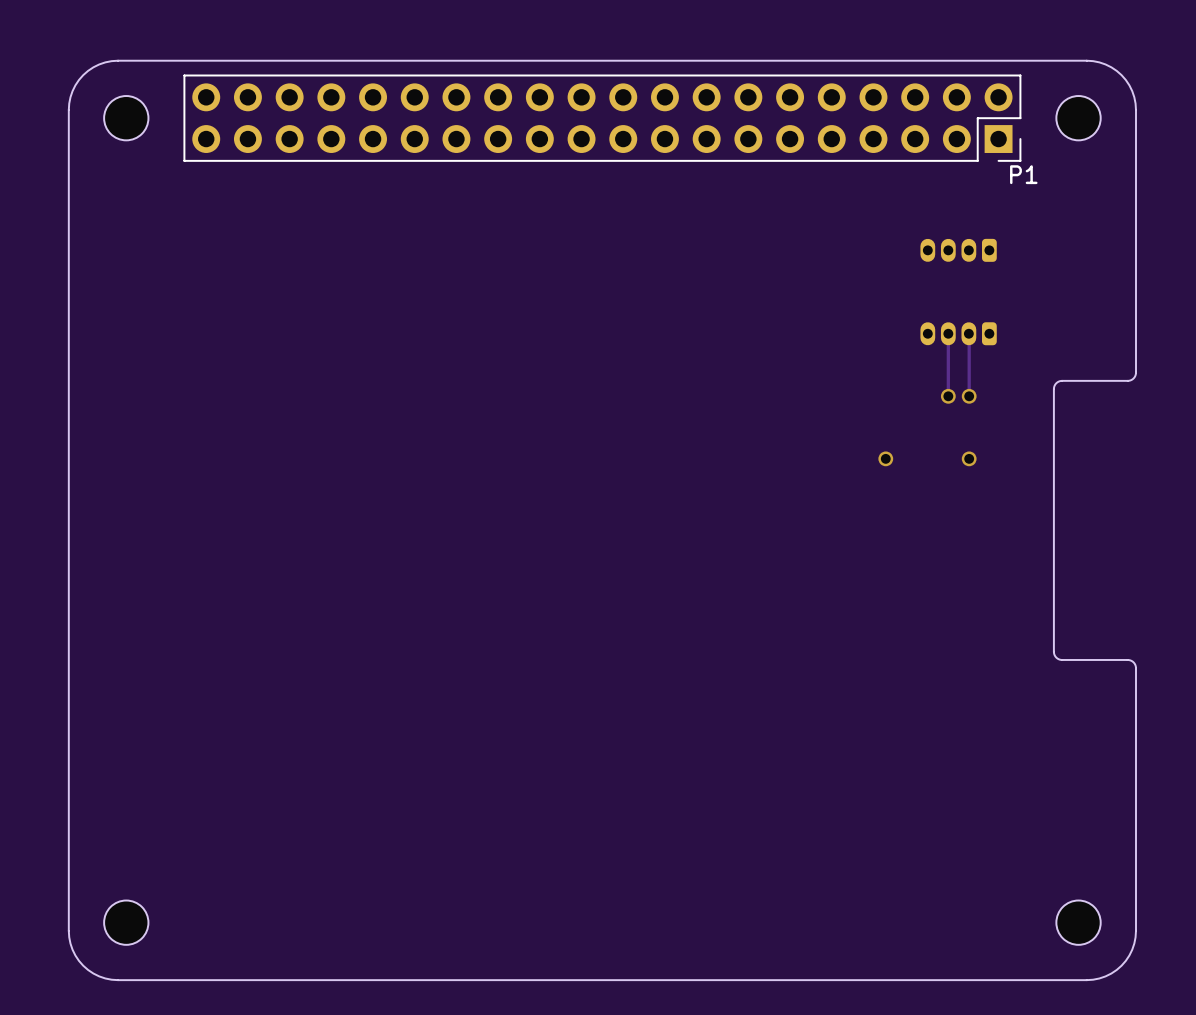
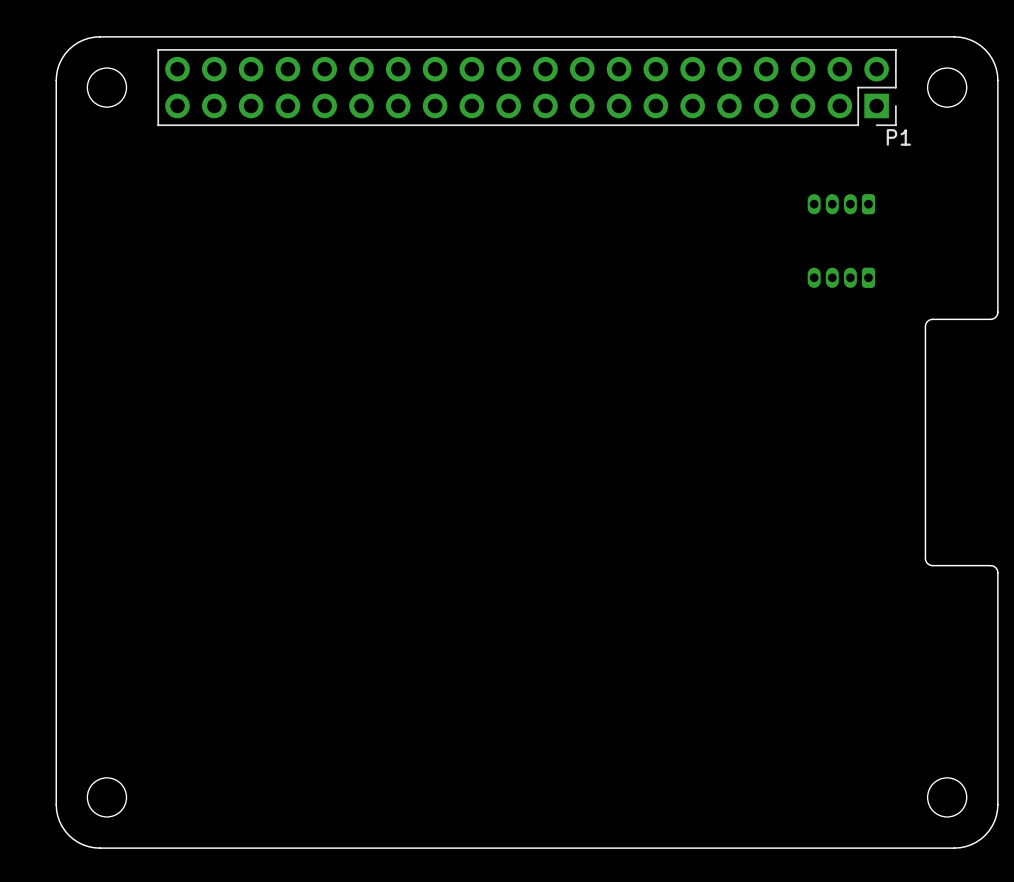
track: (948, 333) (948, 396) -> none
track: (968, 333) (969, 396) -> none
via: (948, 396) -> none
via: (969, 396) -> none
via: (885, 458) -> none
via: (969, 458) -> none

